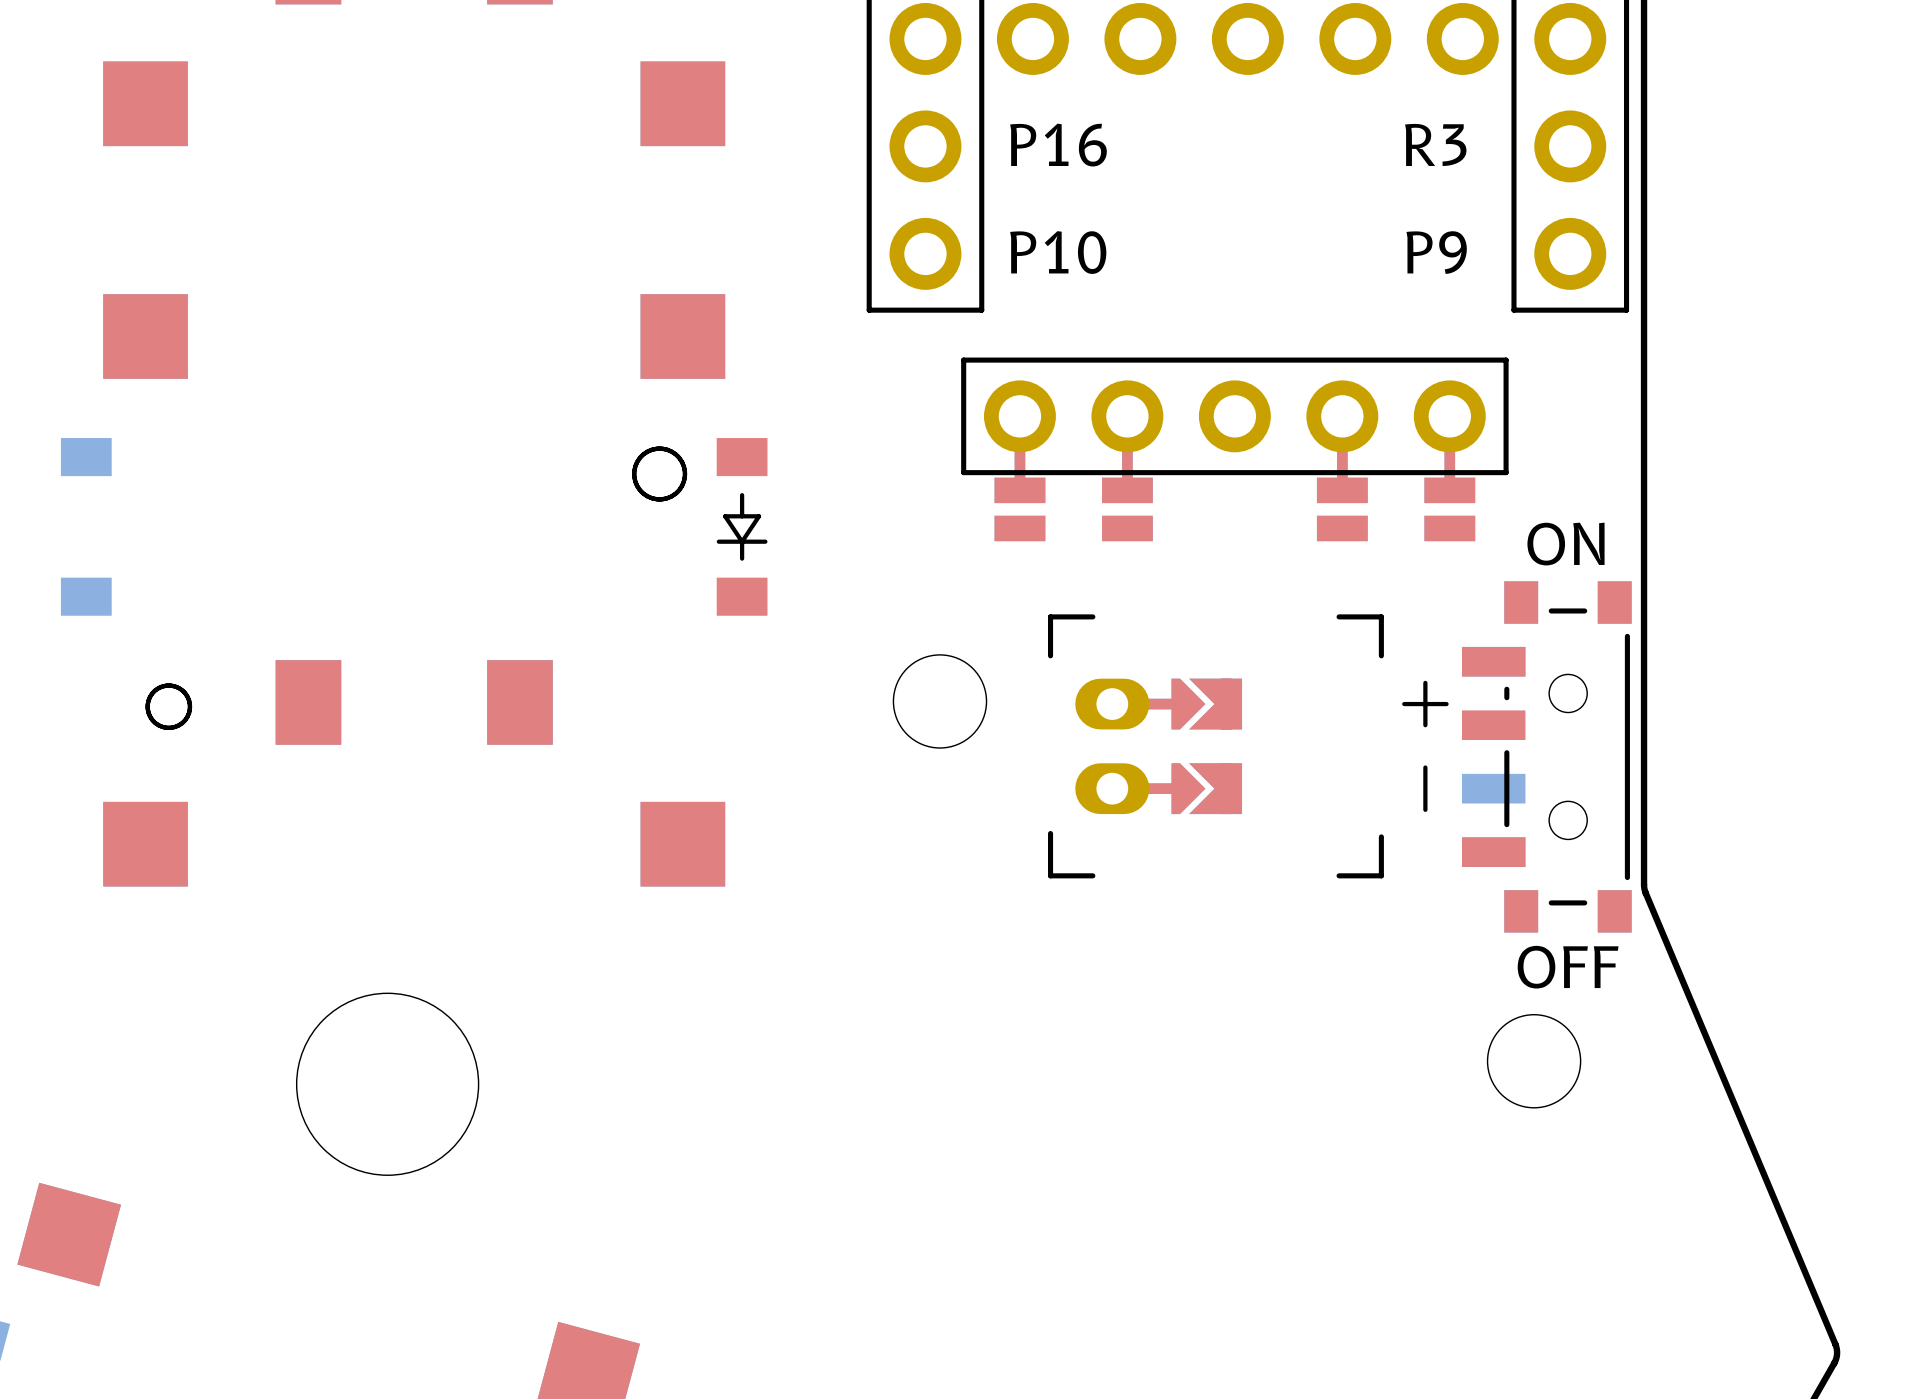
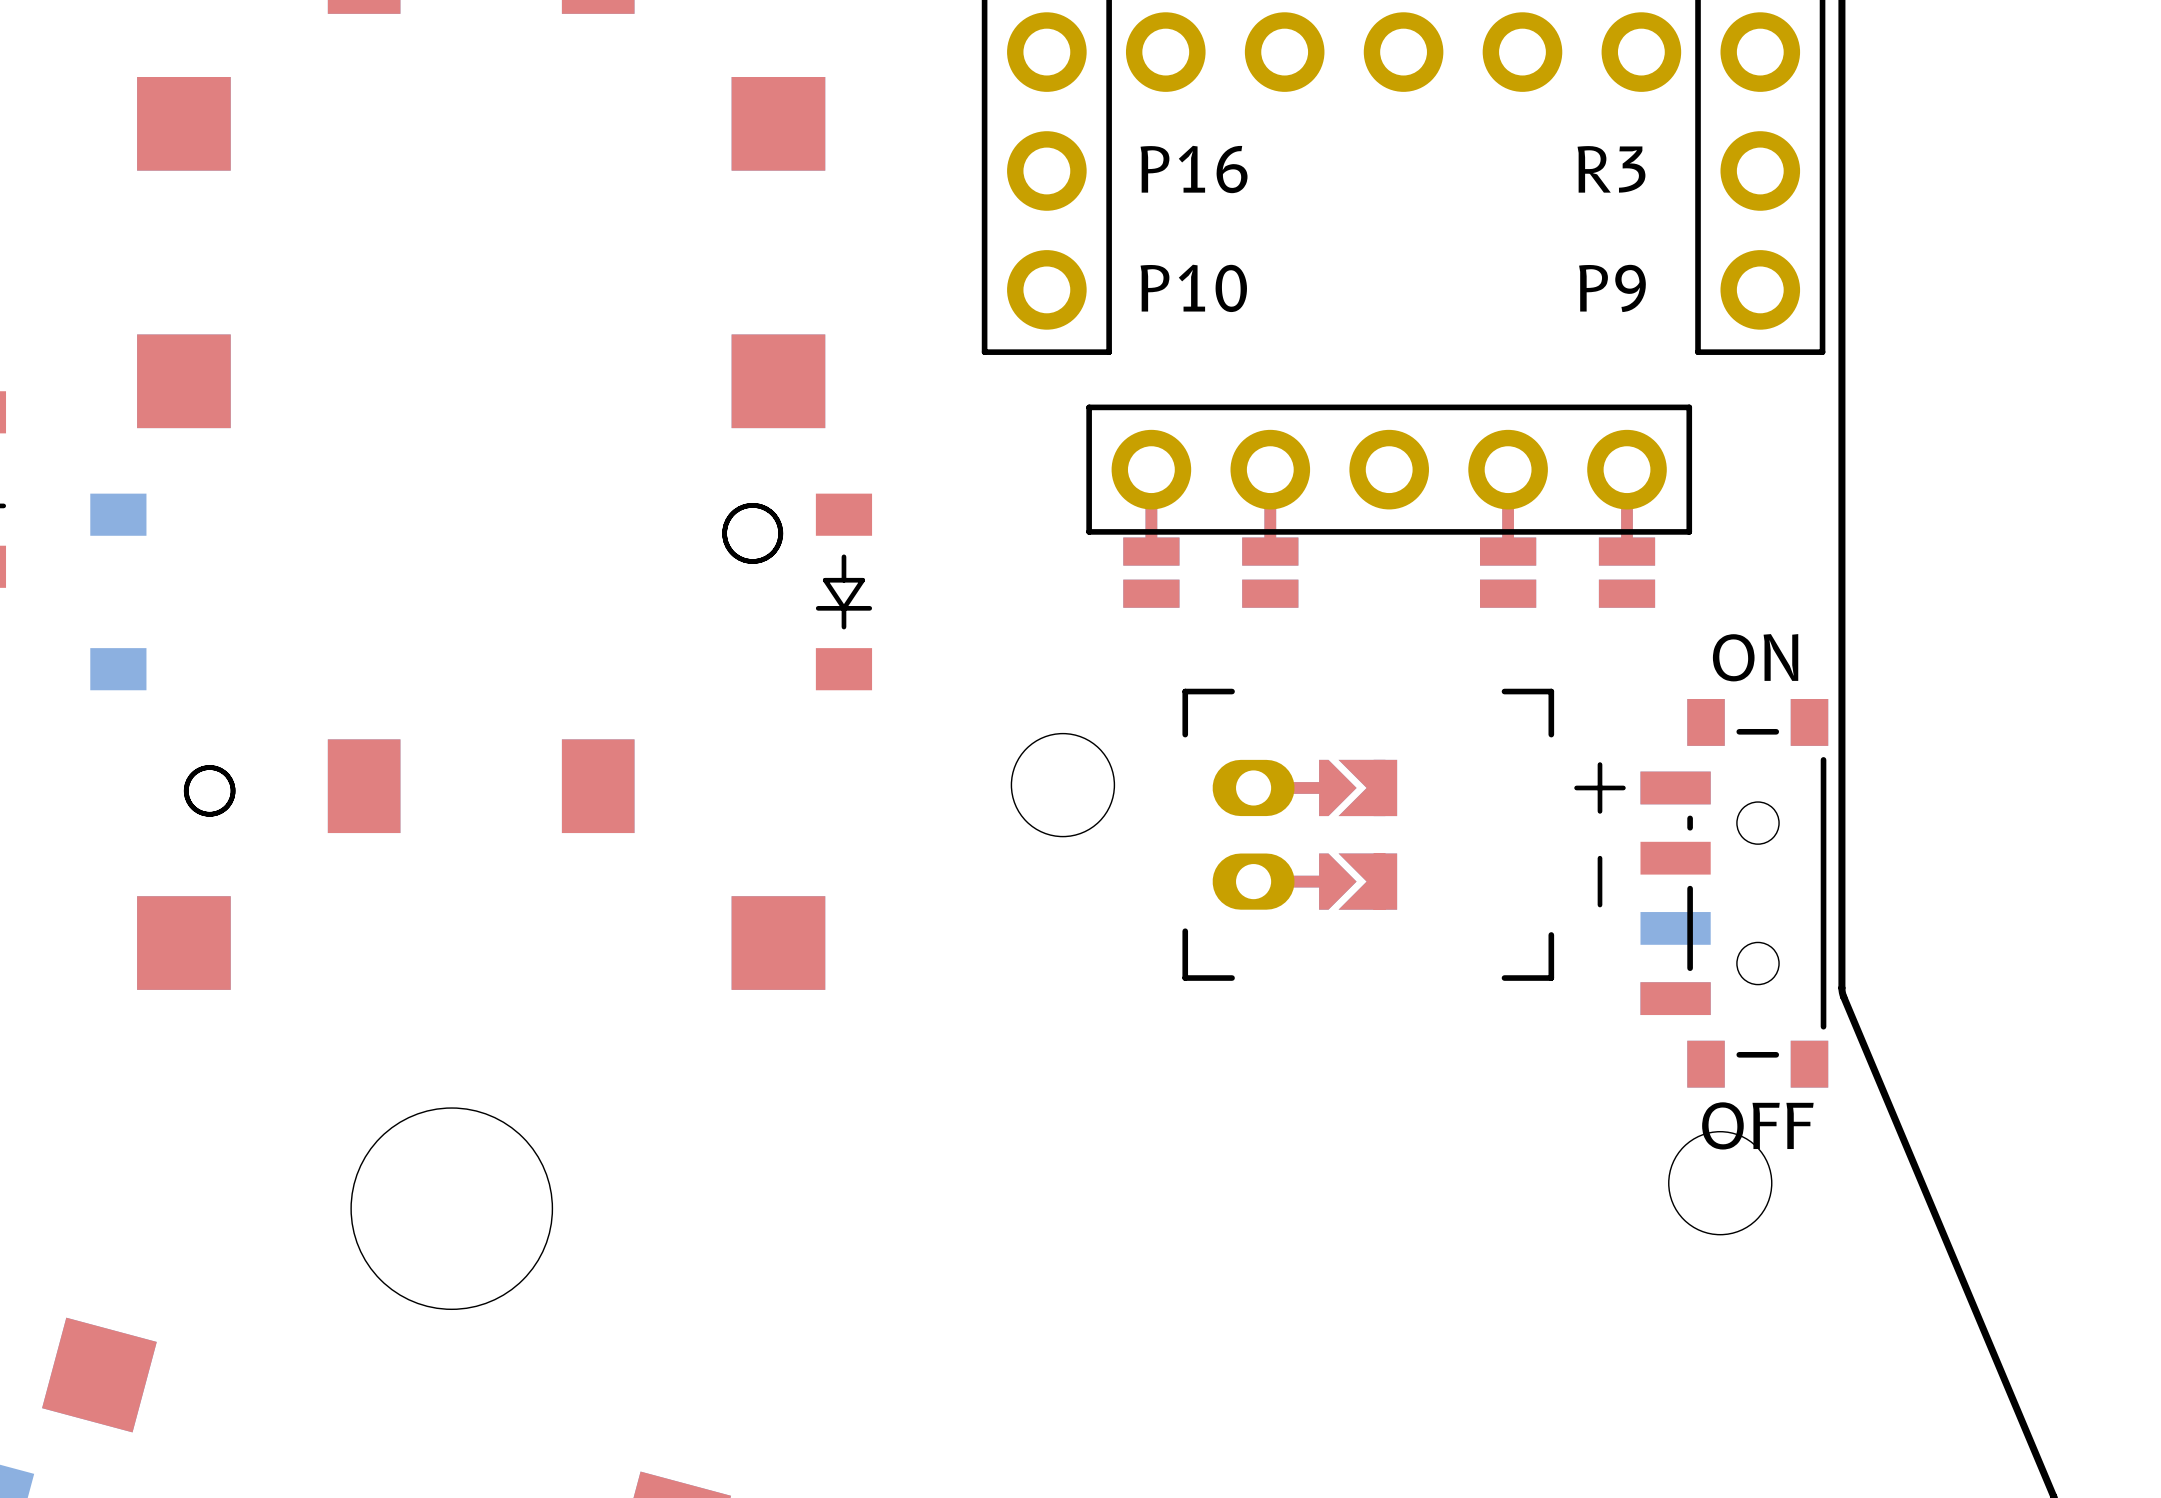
part position: (1546, 756) -> (1734, 893)

